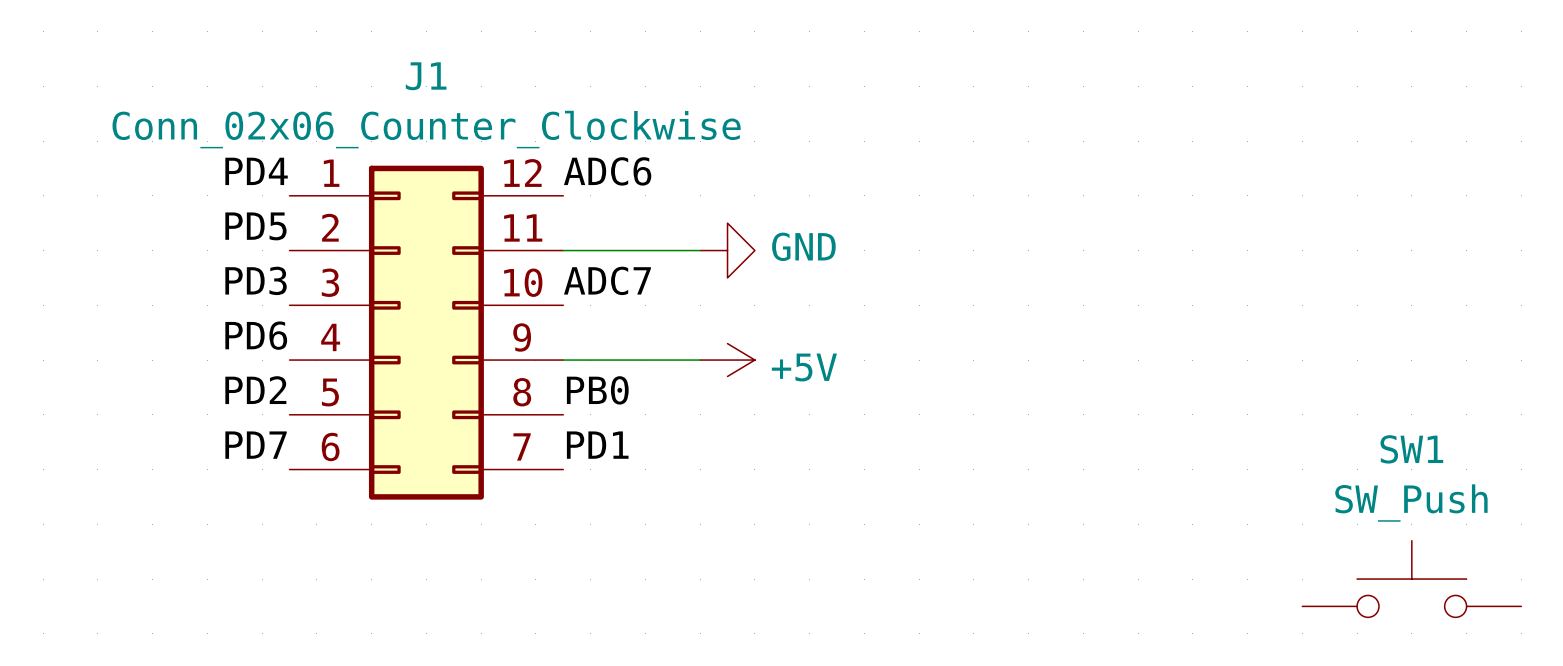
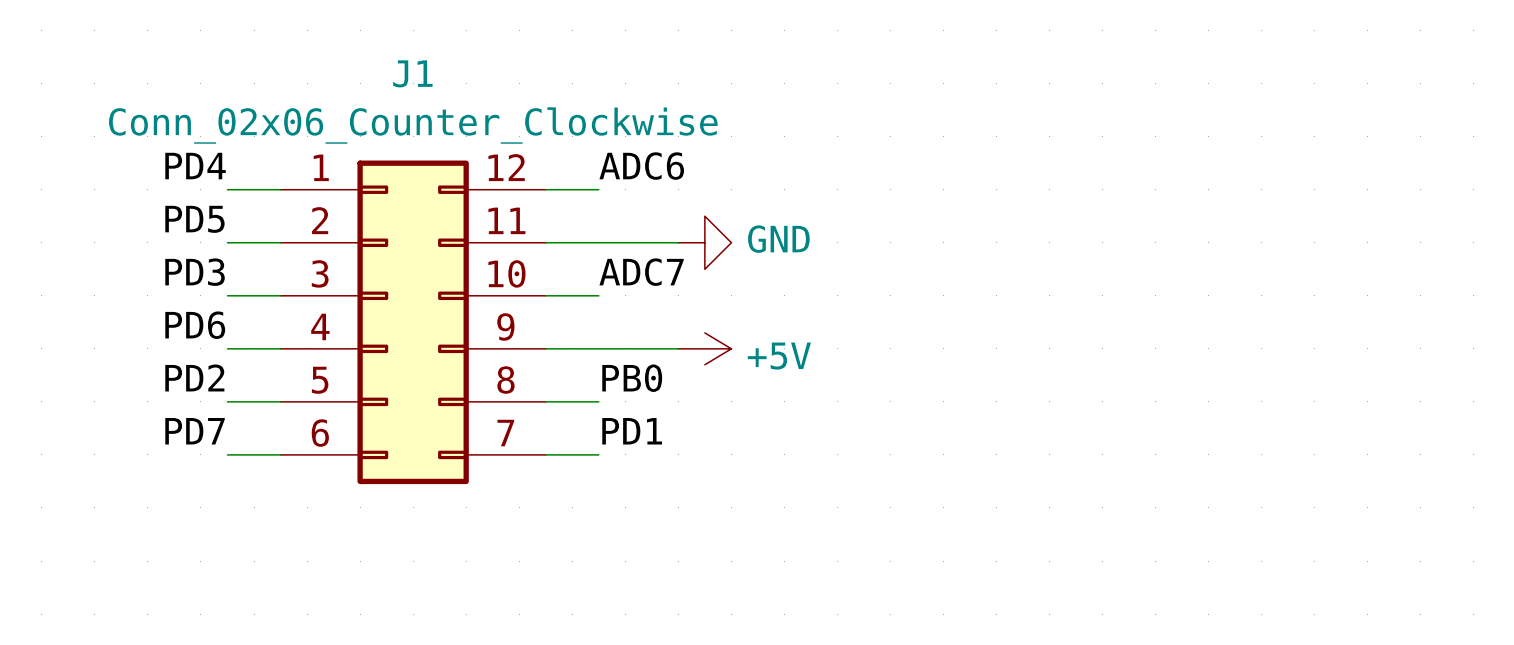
label position: PD4 (256, 171) -> PD4 (195, 166)
label position: ADC6 (607, 171) -> ADC6 (641, 166)
wire: none -> (227, 189) (280, 189)
wire: none -> (545, 189) (598, 189)
label position: PD5 (255, 226) -> PD5 (194, 219)
wire: none -> (227, 242) (280, 242)
label position: PD3 (256, 280) -> PD3 (195, 272)
label position: ADC7 (607, 280) -> ADC7 (641, 272)
wire: none -> (227, 295) (280, 295)
wire: none -> (545, 295) (598, 295)
label position: PD6 (256, 335) -> PD6 (195, 325)
wire: none -> (227, 348) (280, 348)
label position: PD2 (255, 390) -> PD2 (194, 377)
label position: PB0 (597, 390) -> PB0 (632, 378)
wire: none -> (227, 401) (280, 401)
wire: none -> (545, 401) (598, 401)
label position: PD7 (256, 445) -> PD7 (195, 431)
label position: PD1 (597, 445) -> PD1 (632, 431)
wire: none -> (227, 454) (280, 454)
wire: none -> (545, 454) (598, 454)
SW1: SW_Push (1411, 579) -> none

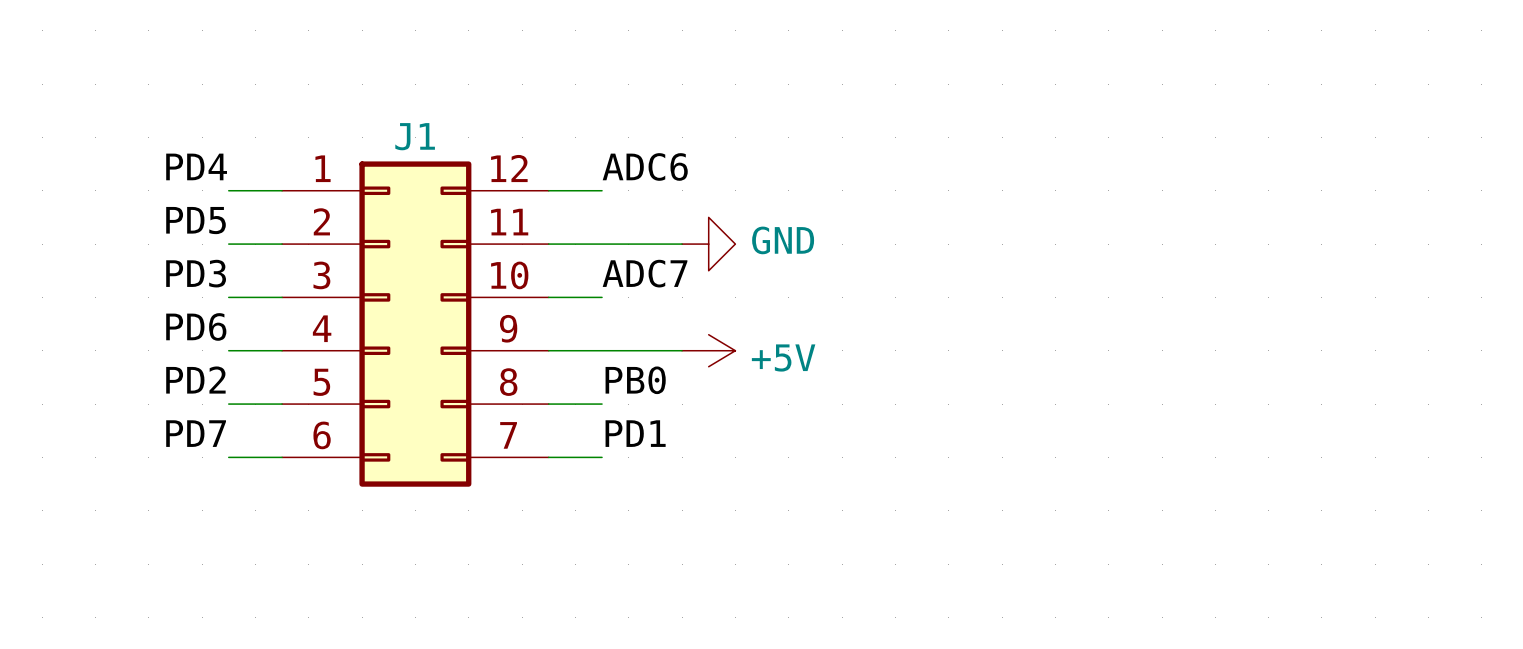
J1 name position: J1 (412, 73) -> J1 (415, 136)
J1 value: Conn_02x06_Counter_Clockwise (413, 125) -> none

